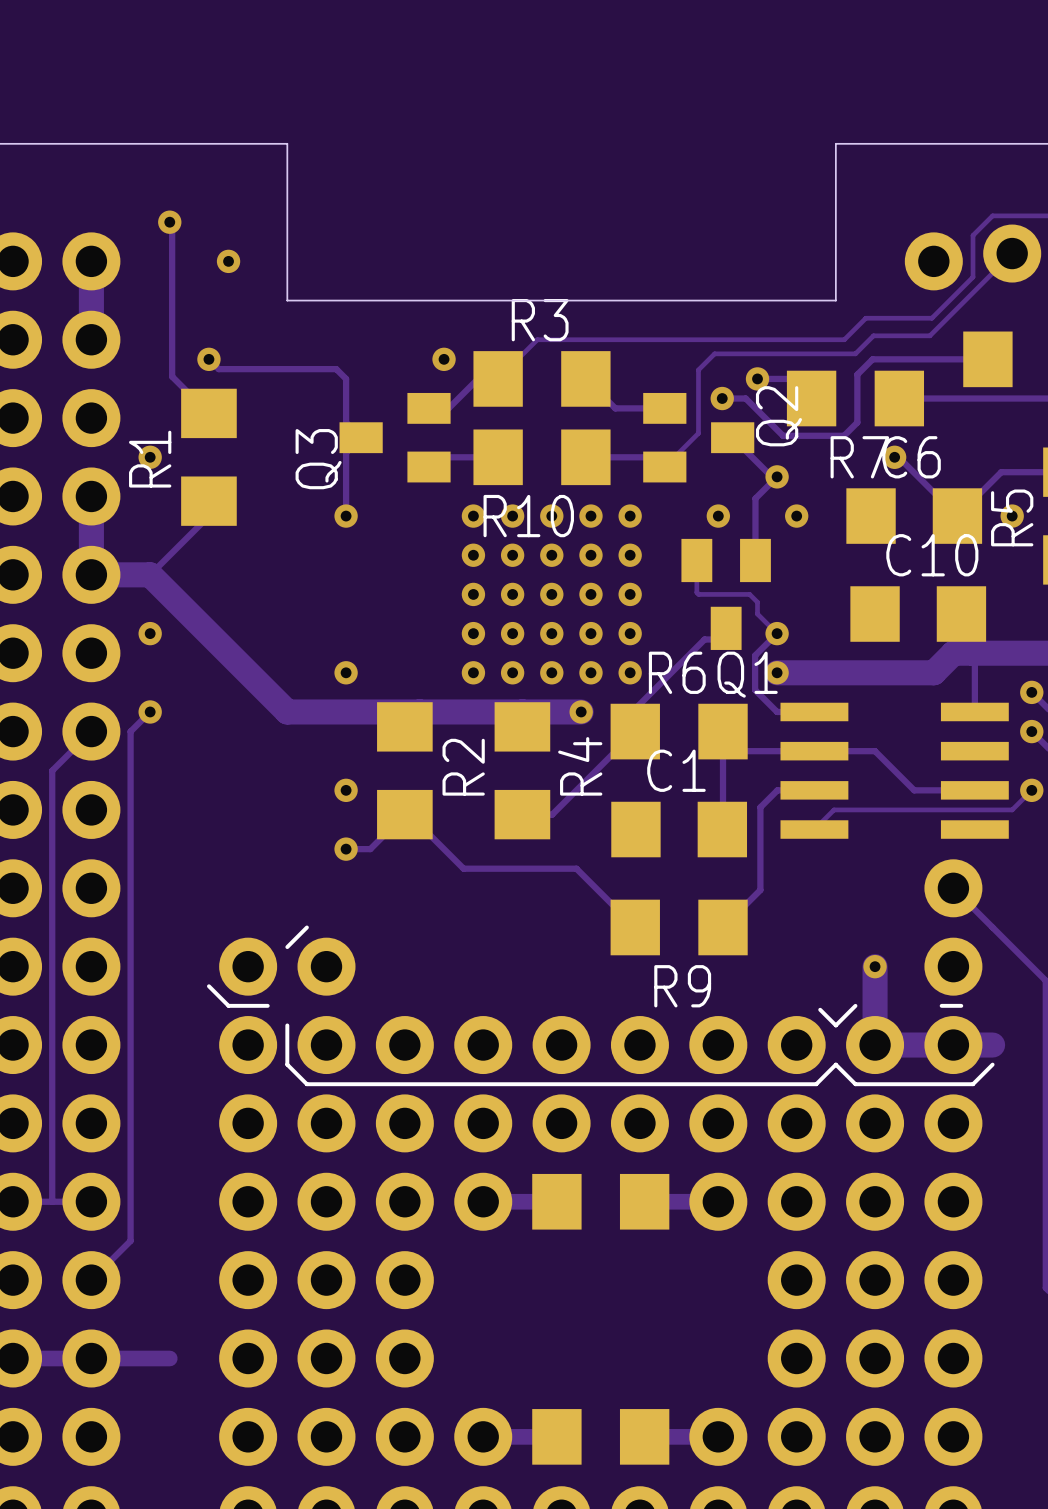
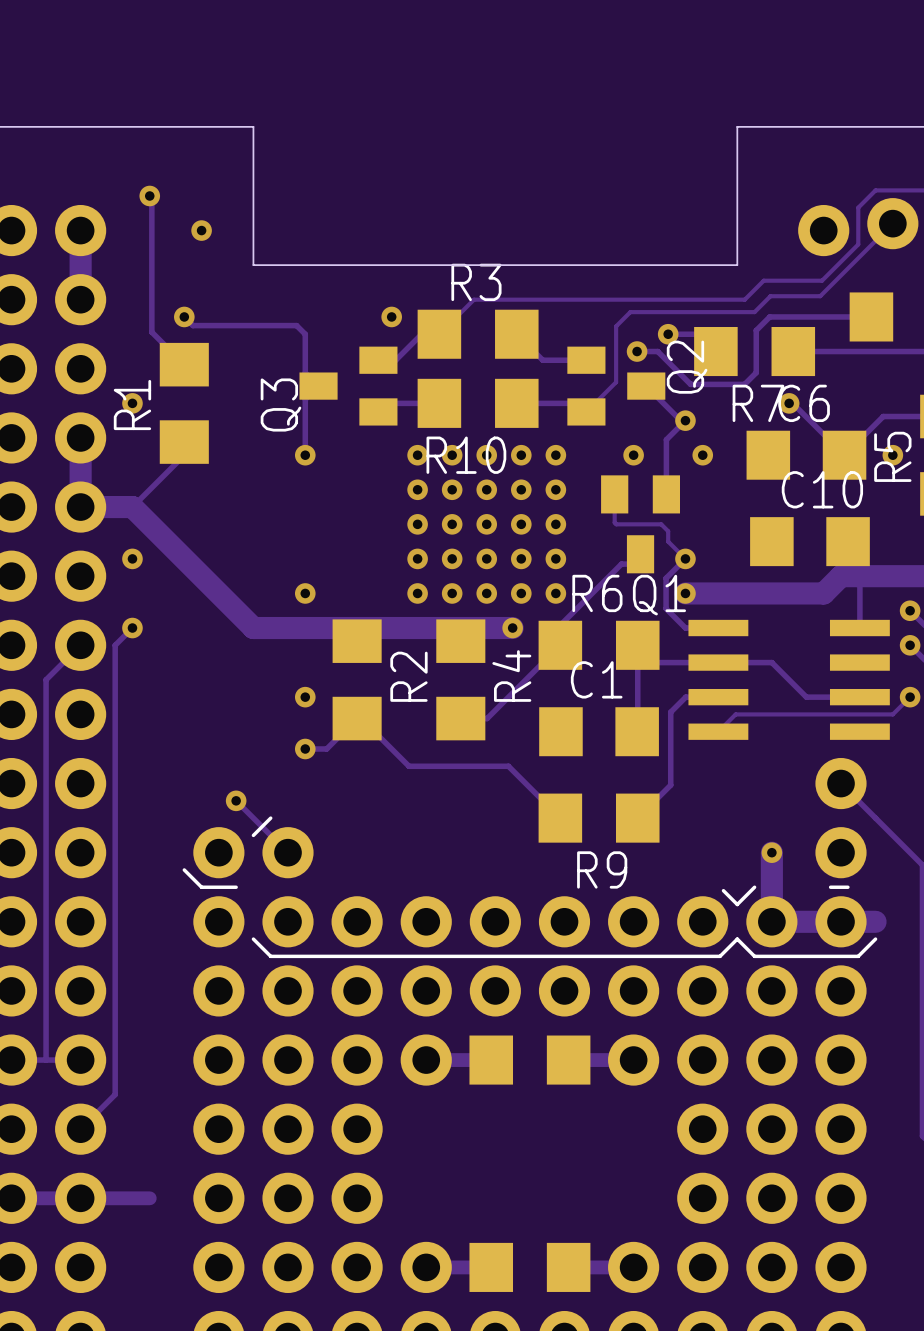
track: none -> (236, 800) (288, 852)
via: none -> (236, 800)
line: (287, 1025) (287, 1064) -> none

